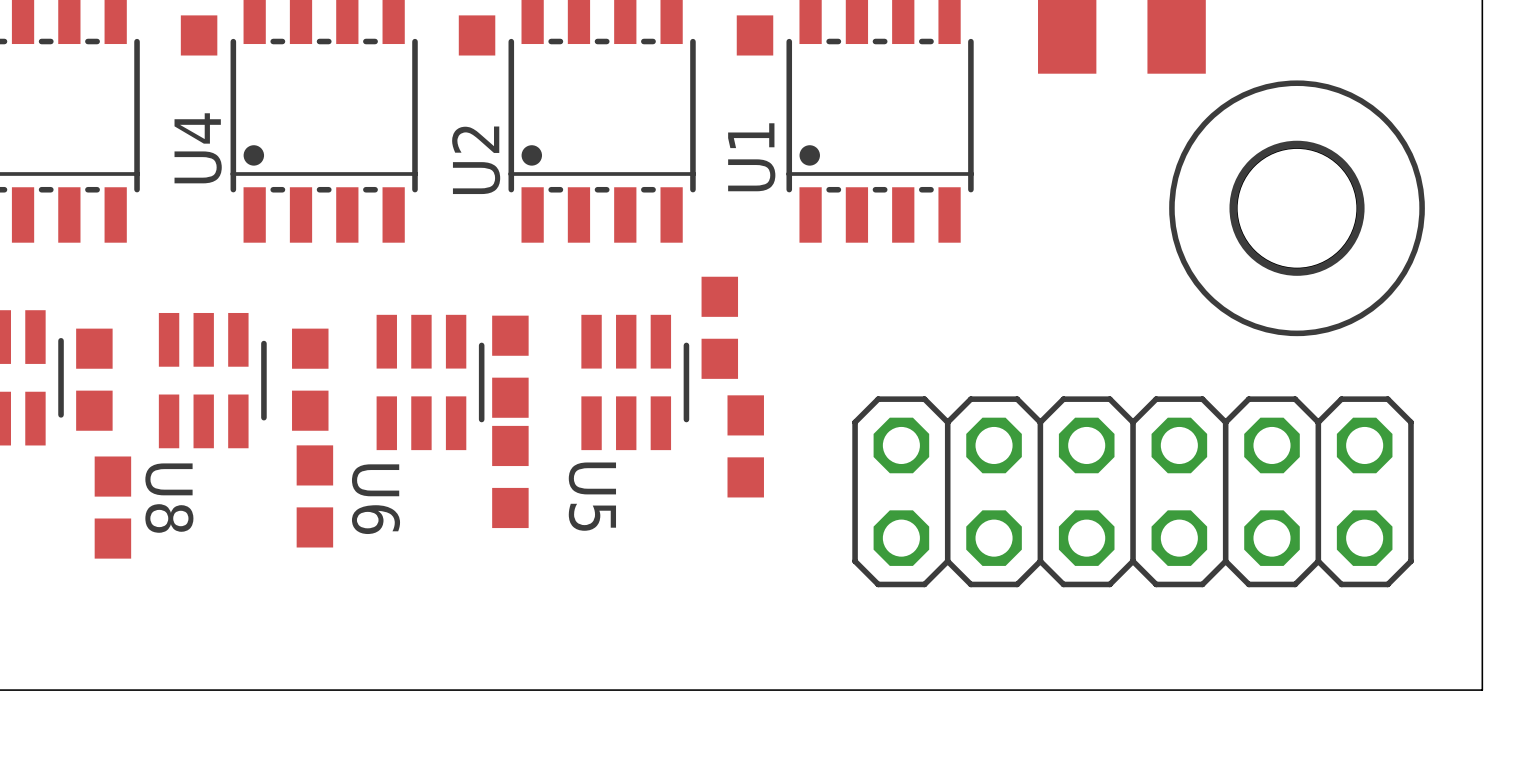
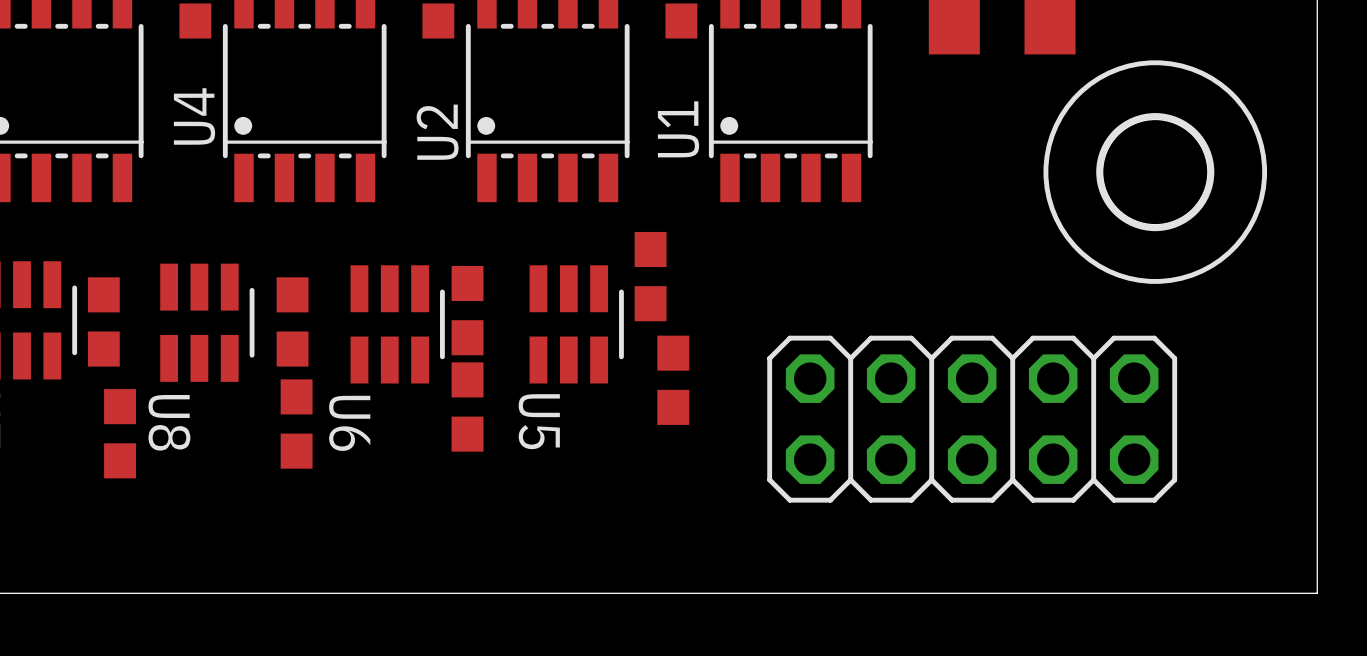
part: none -> (972, 419)
part: (1133, 491) -> none

